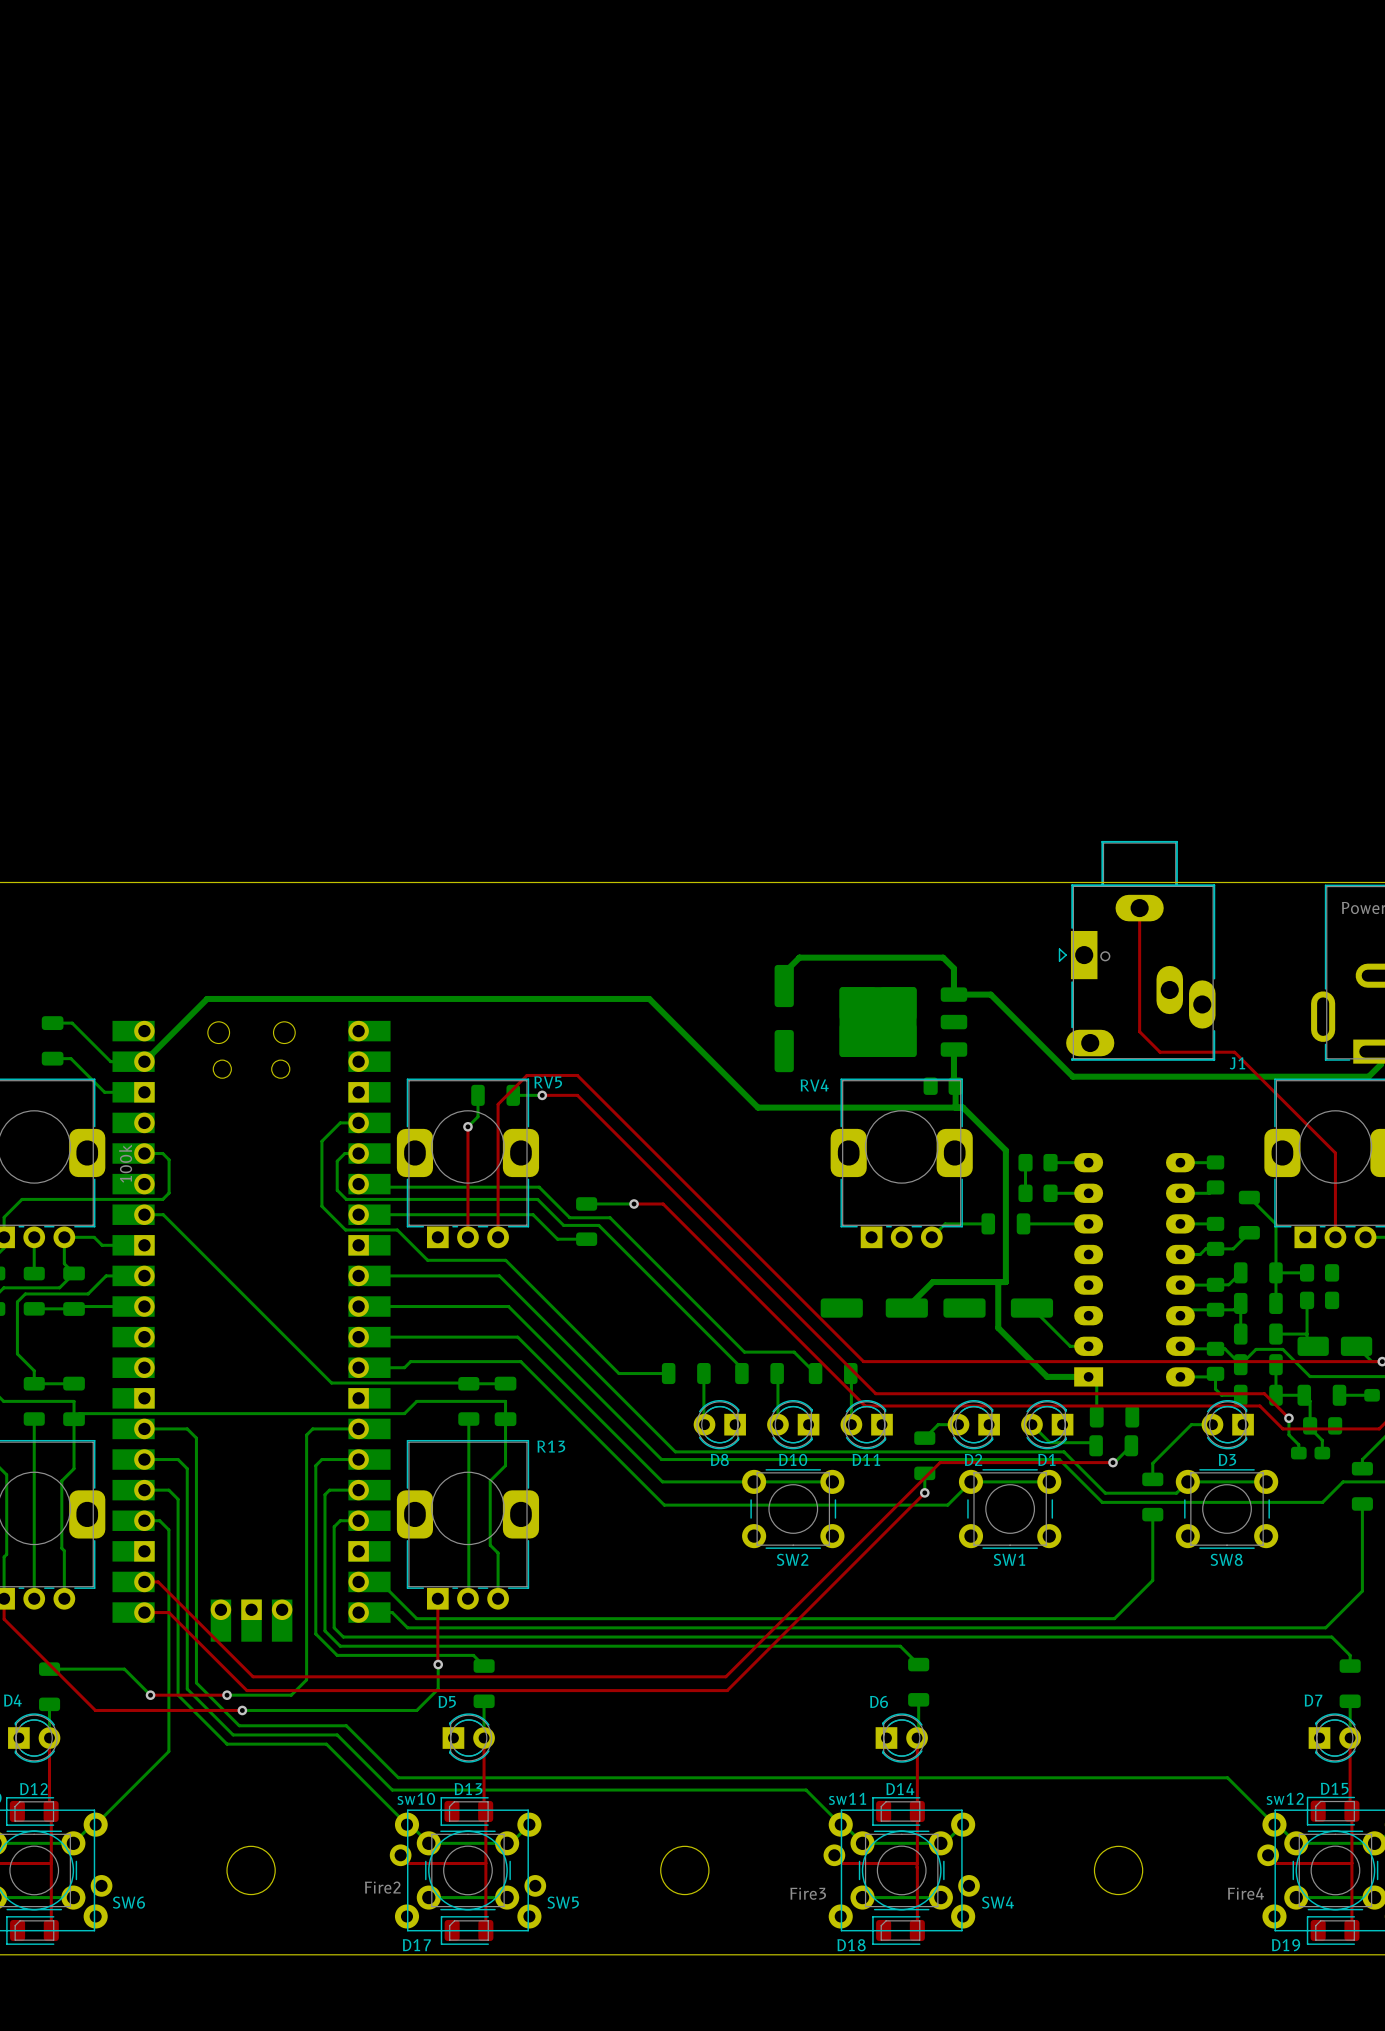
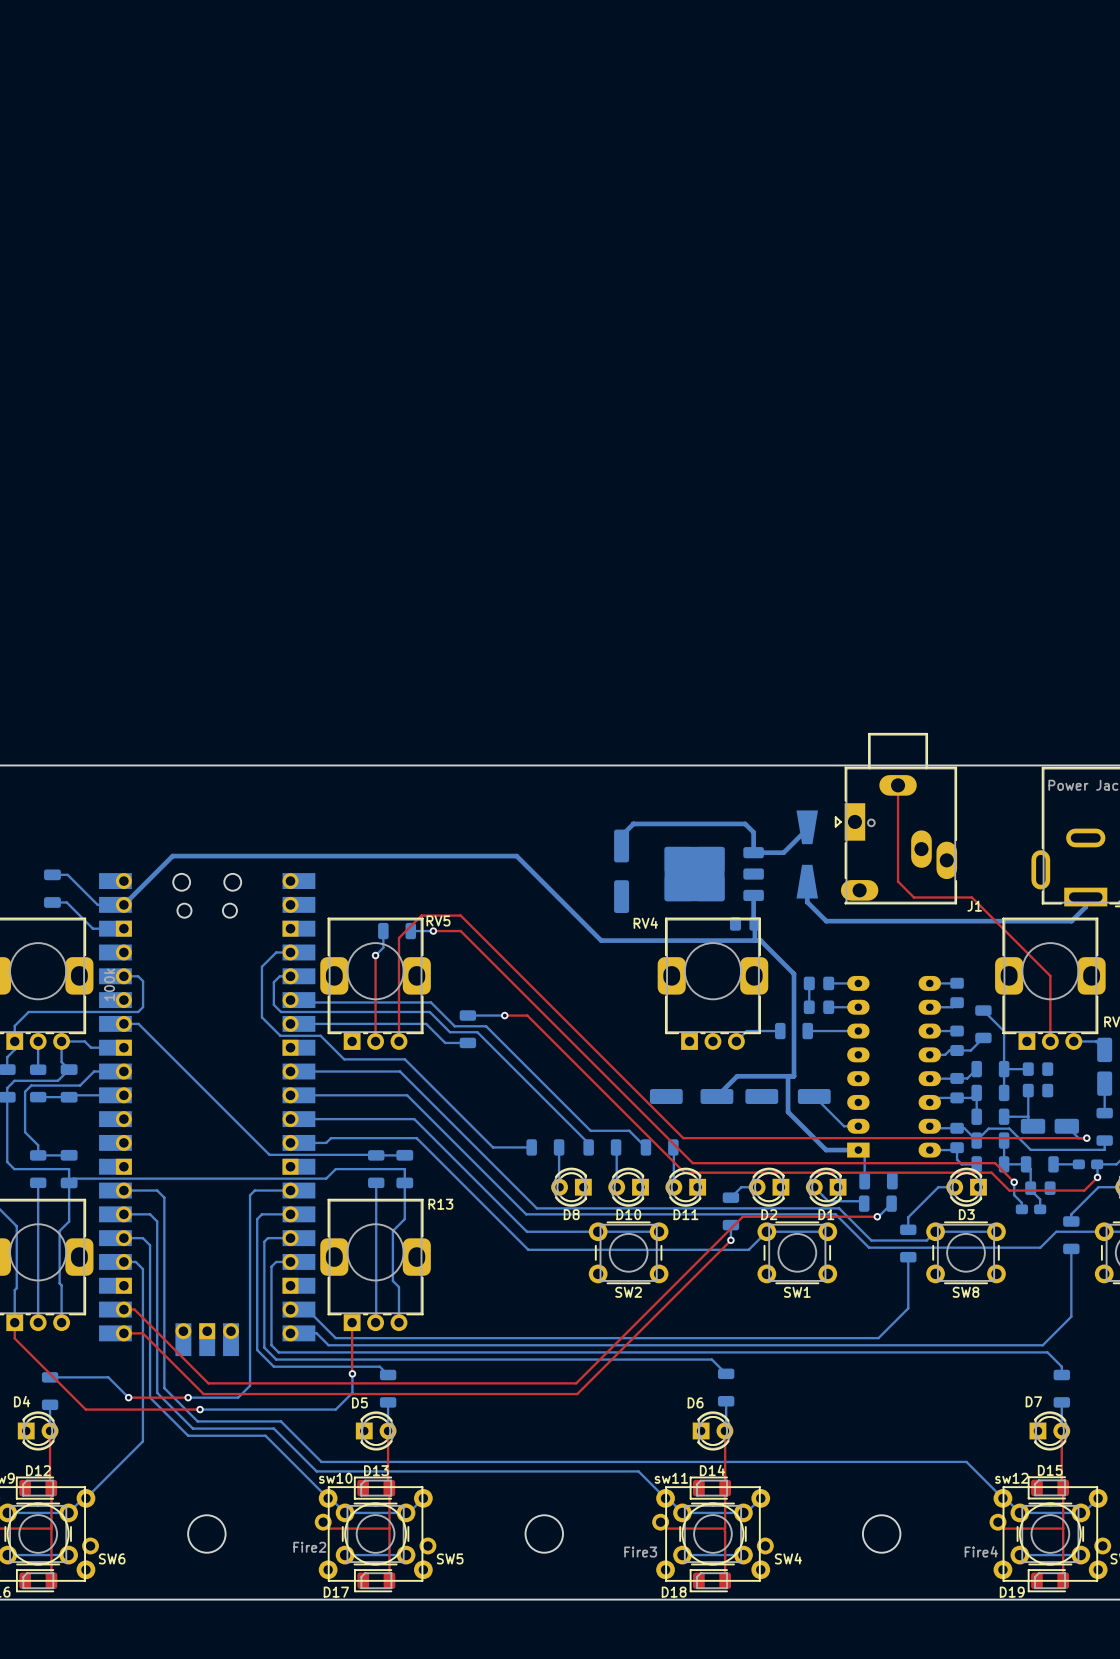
bottom track: none -> (807, 829) (782, 852)
bottom track: (990, 994) (1072, 1076) (1368, 1076) -> (807, 879) (807, 902) (826, 921) (1071, 921) (1076, 916)
part: none -> (807, 854)

